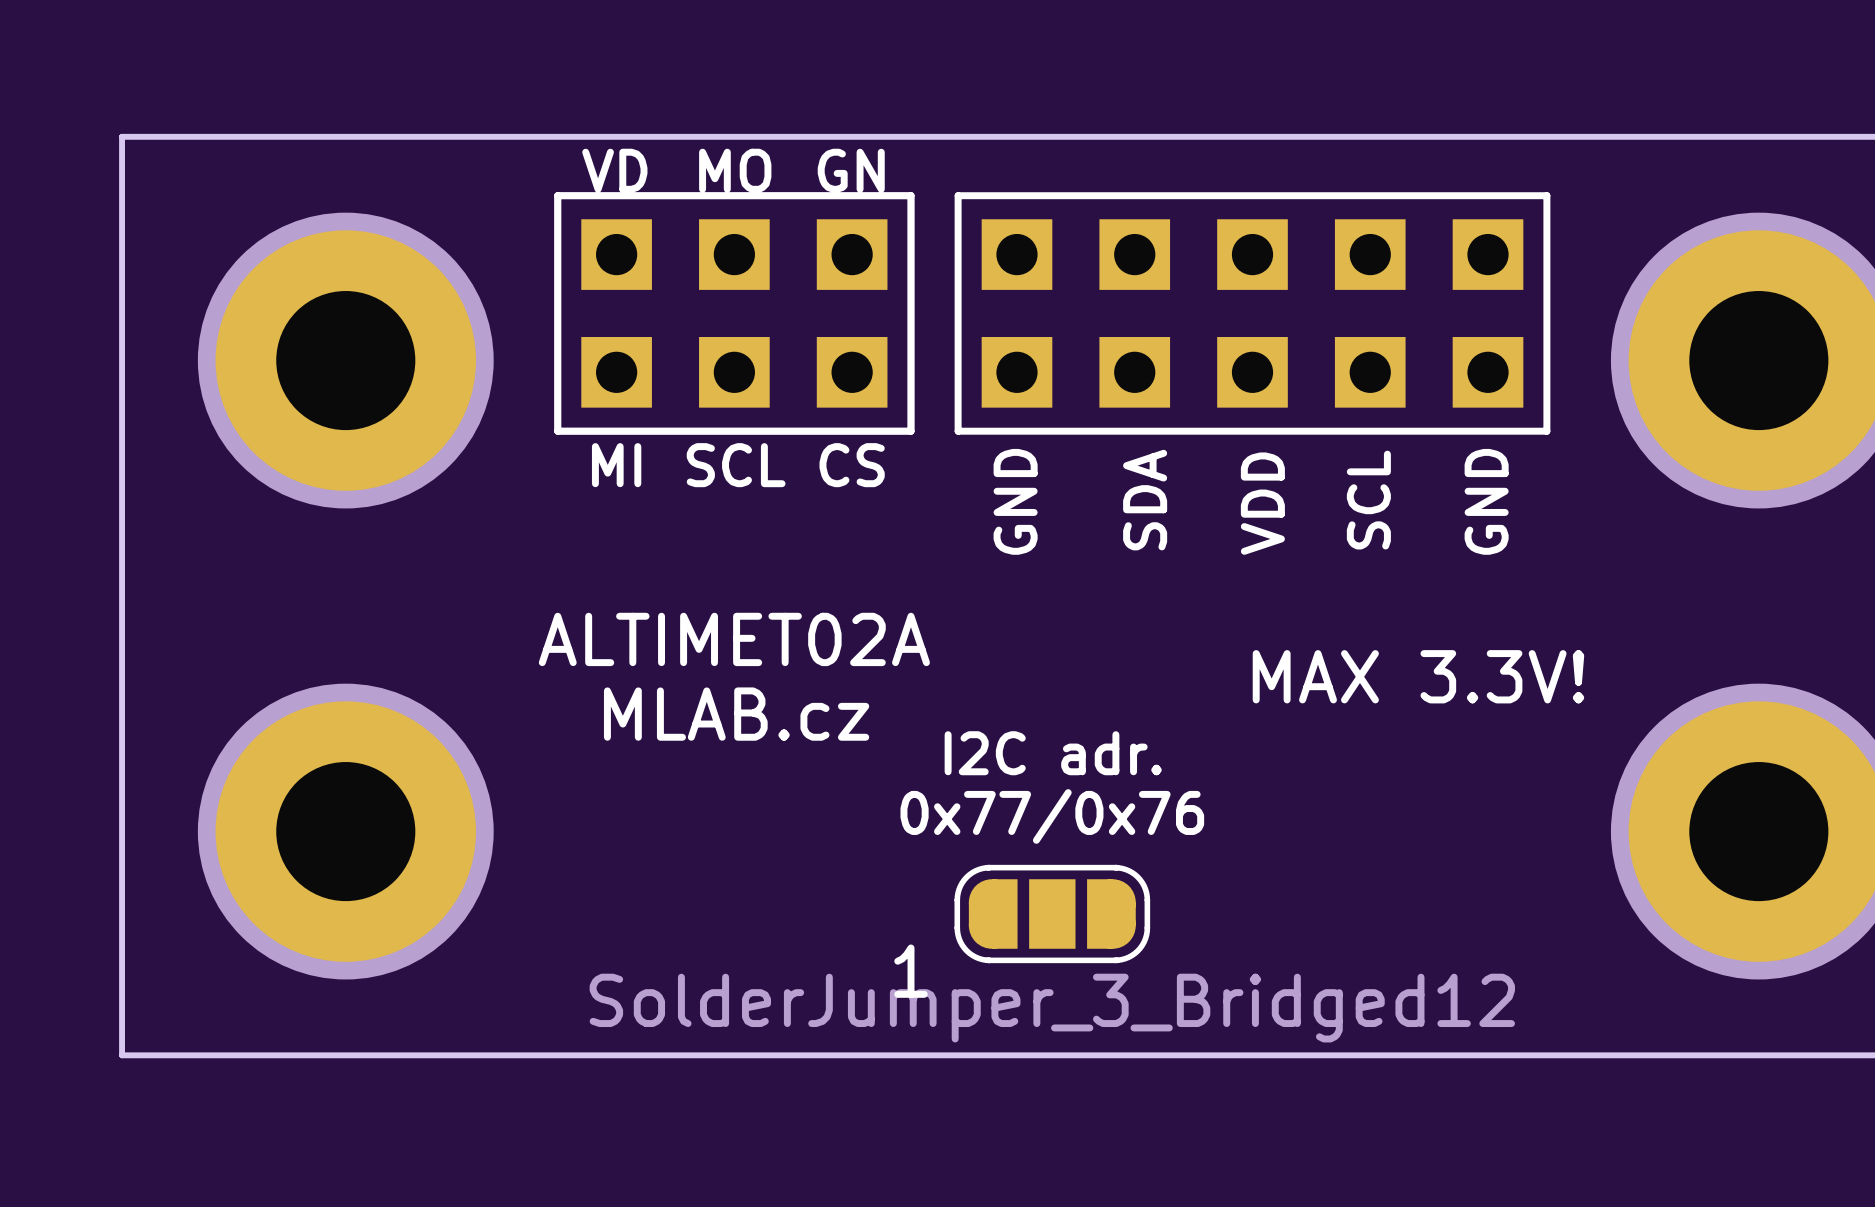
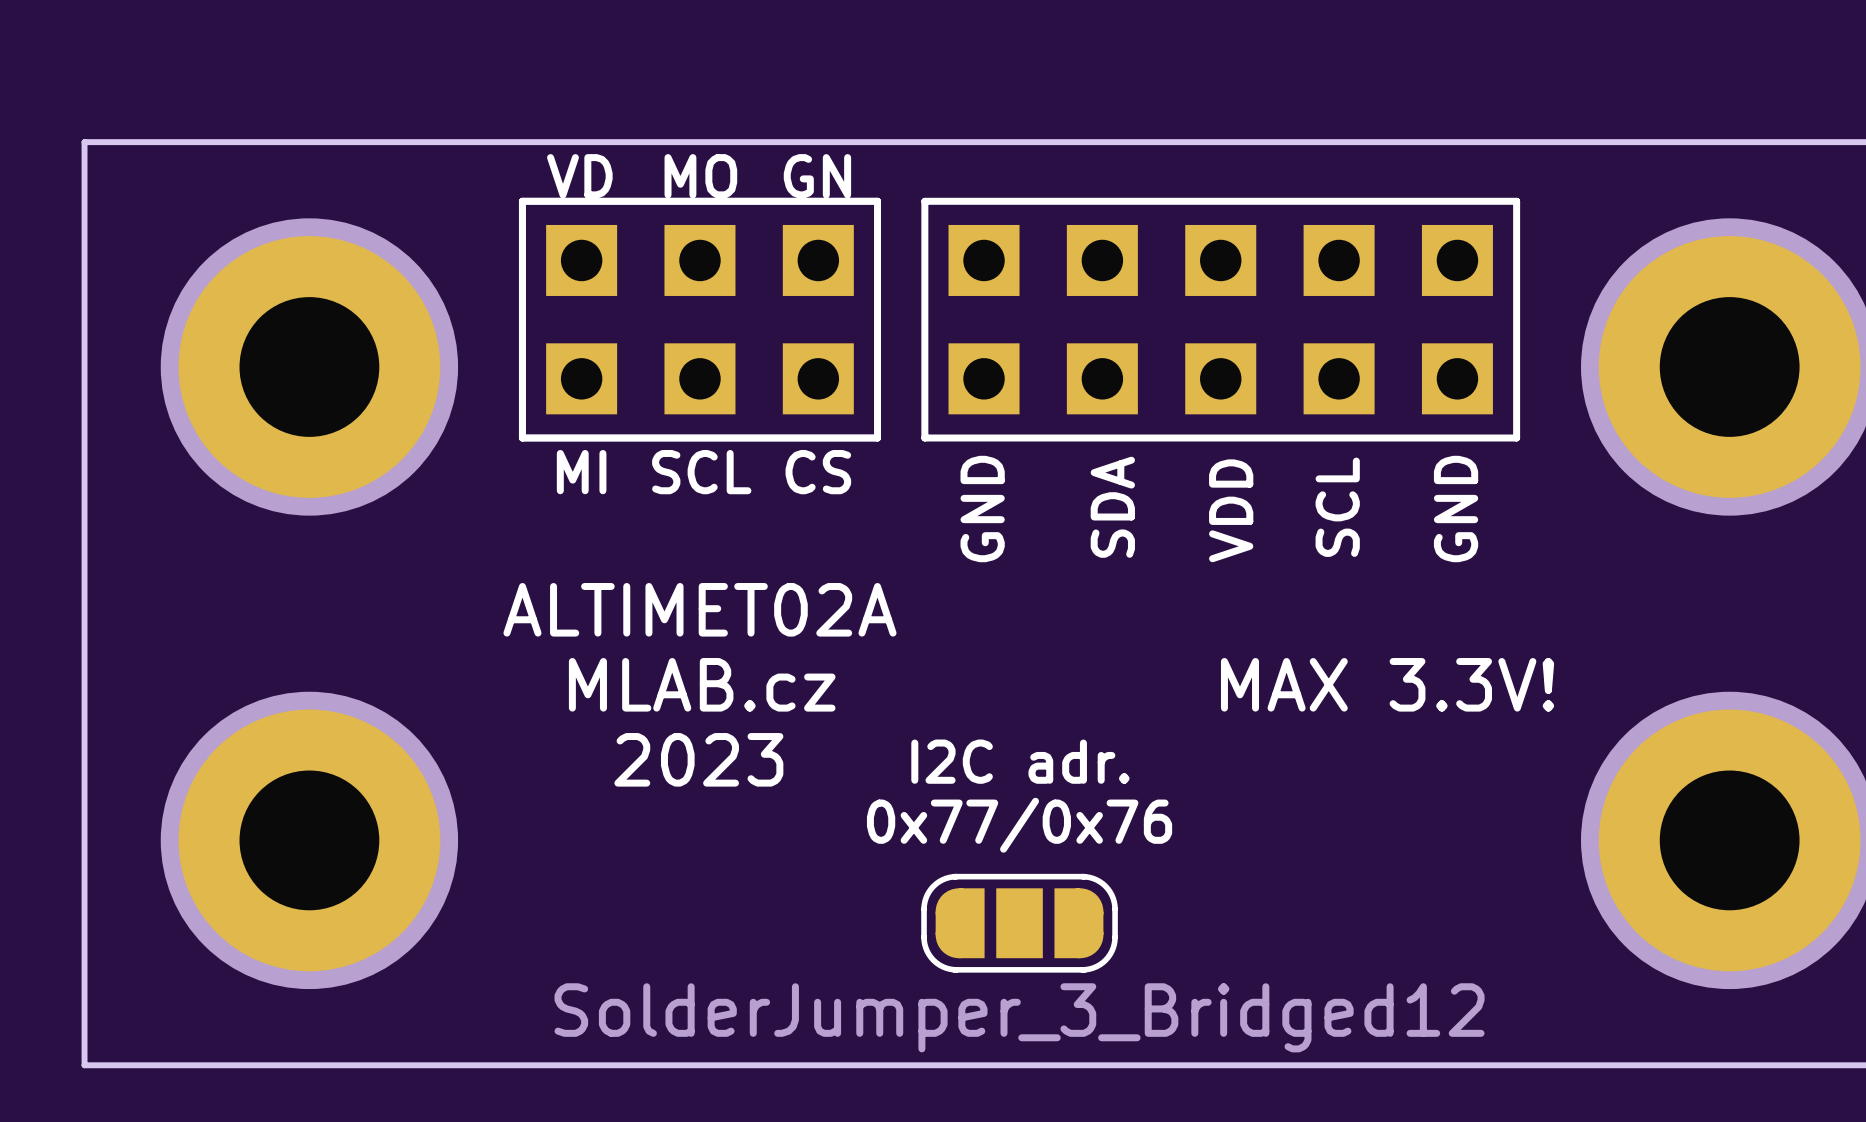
text position: ALTIMET02A (734, 639) -> ALTIMET02A (699, 609)
text position: MLAB.cz (736, 714) -> MLAB.cz (702, 684)
text: none -> 2023 (698, 759)
part text: 1 (911, 971) -> none

